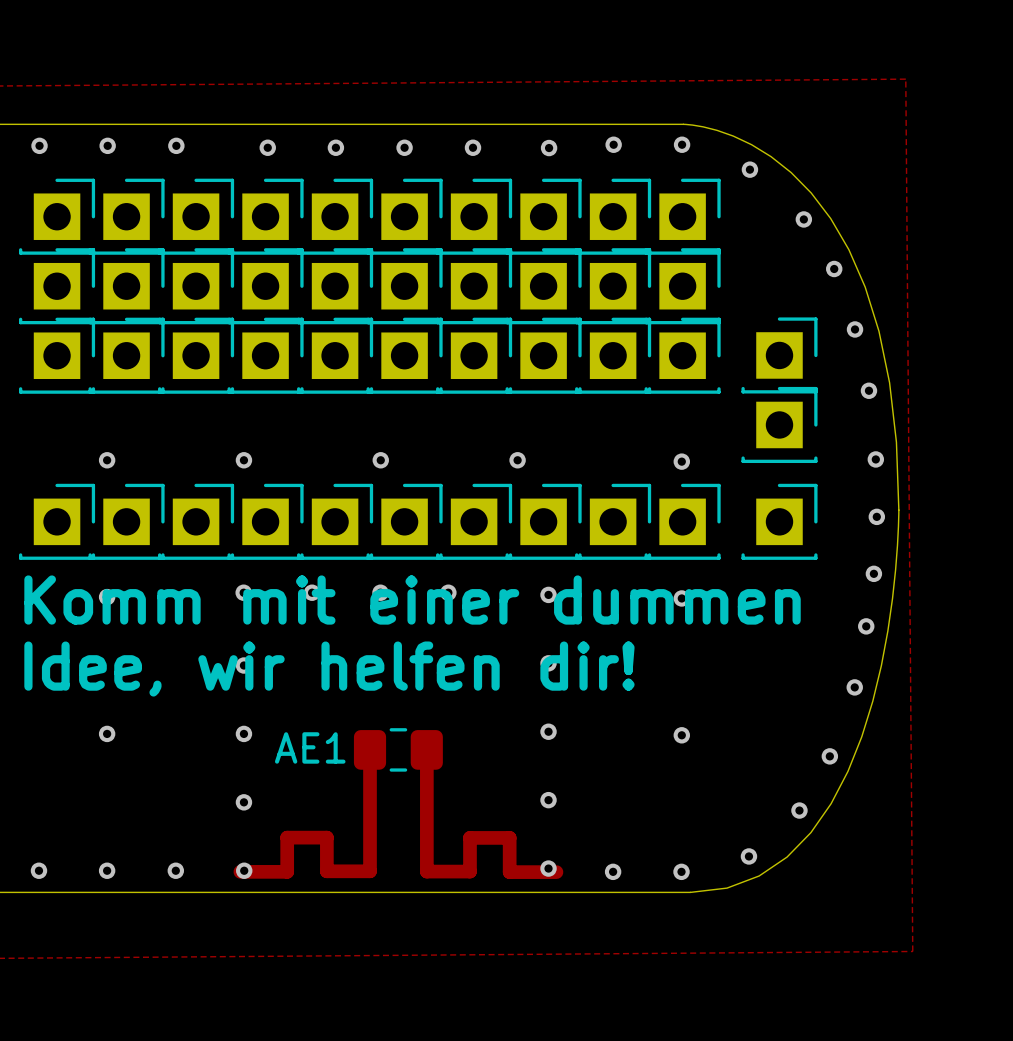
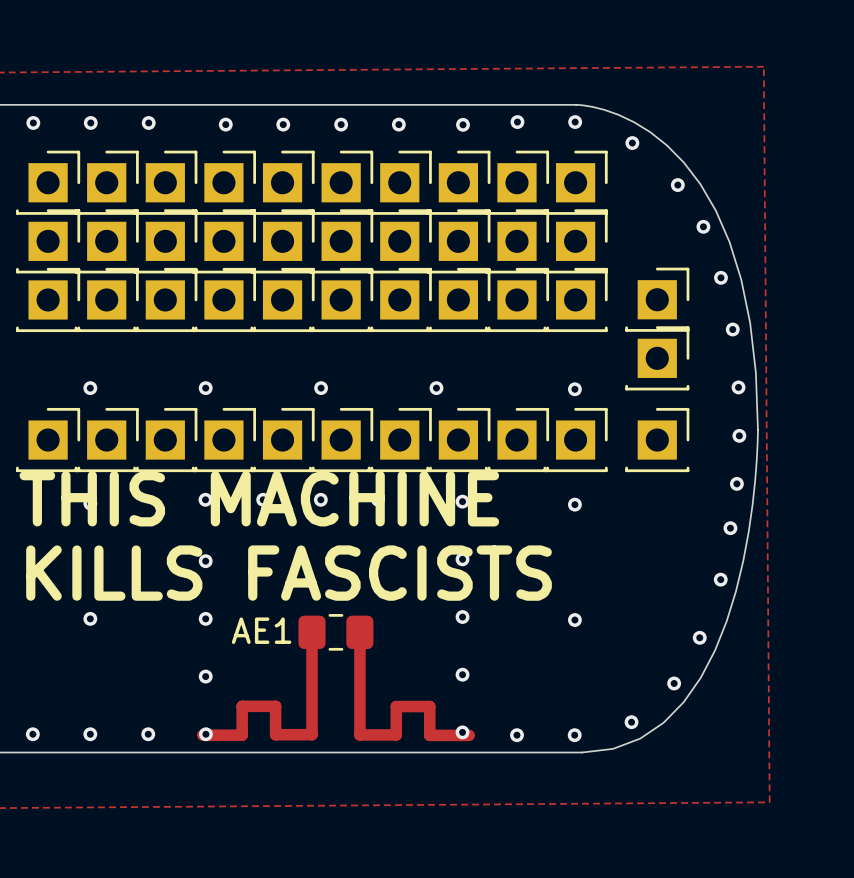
text: Komm mit einer dummen (412, 600) -> THIS MACHINE (259, 498)
text: Idee, wir helfen dir! (329, 669) -> KILLS FASCISTS (289, 573)

